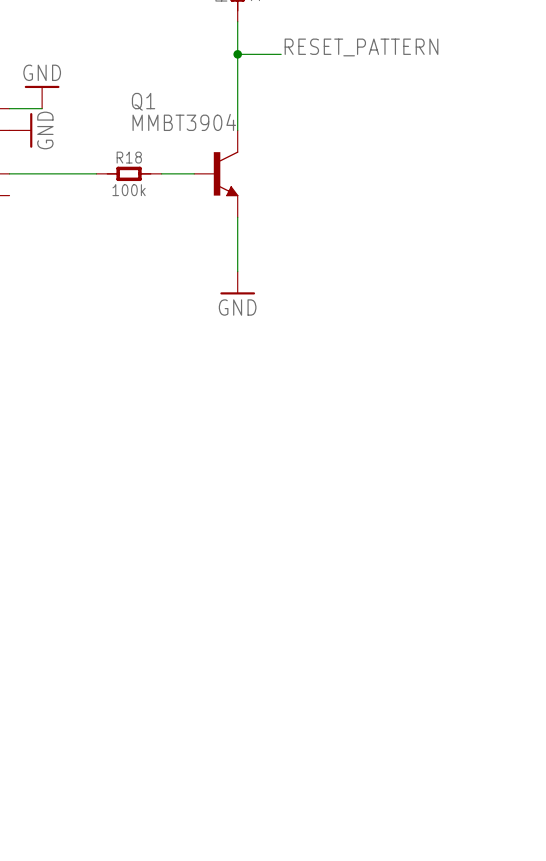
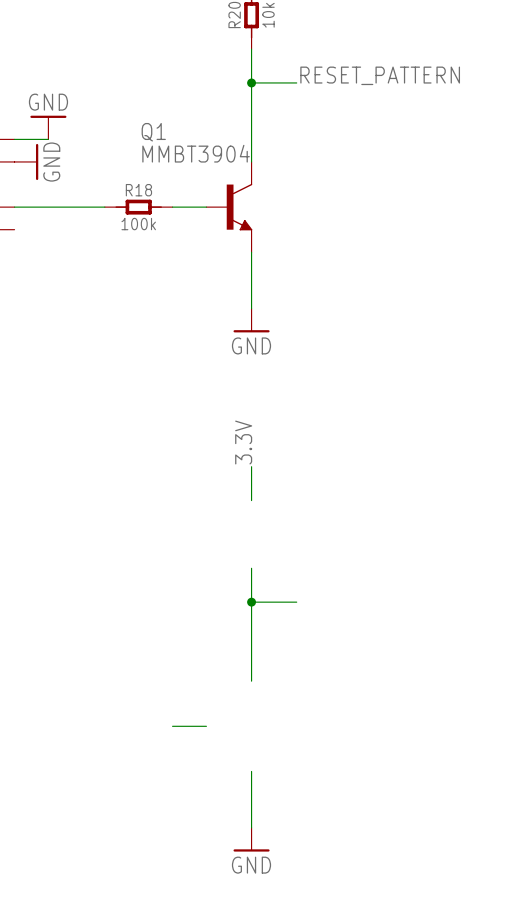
label: none -> 3.3V (243, 442)
wire: none -> (251, 466) (251, 500)
wire: none -> (251, 568) (251, 681)
wire: none -> (251, 602) (296, 602)
junction: none -> (251, 602)
wire: none -> (172, 726) (206, 726)
wire: none -> (251, 771) (251, 827)
power symbol: none -> GND (251, 839)

